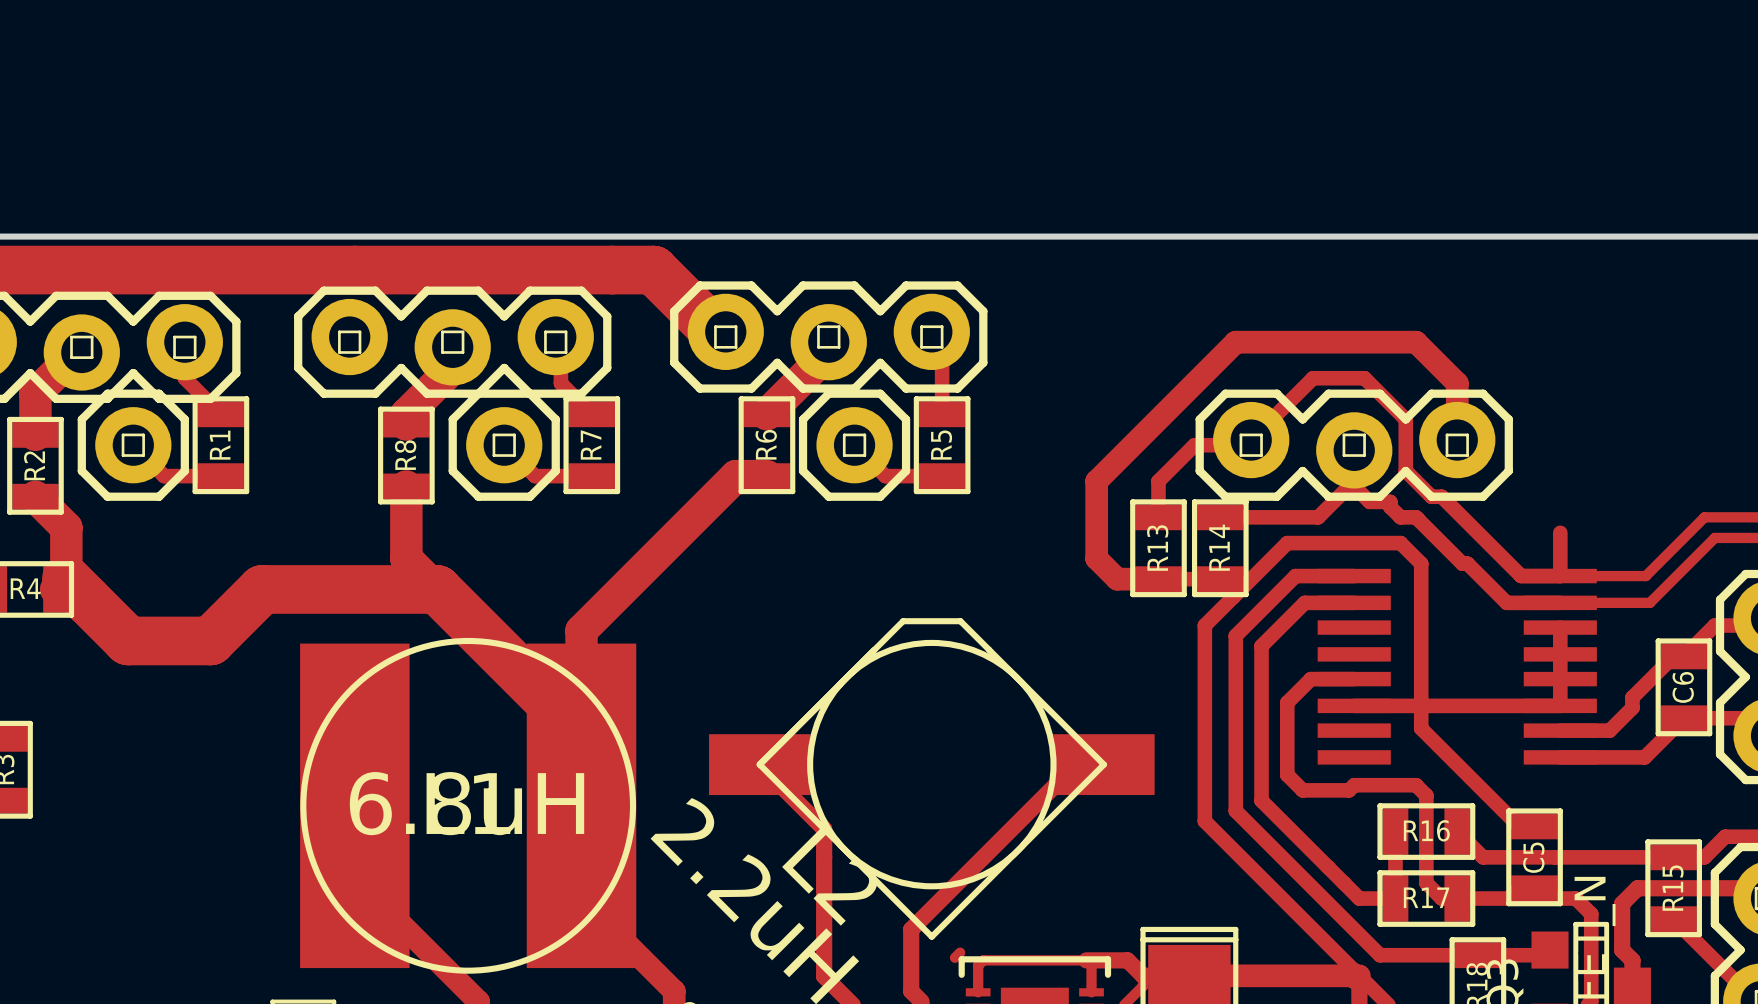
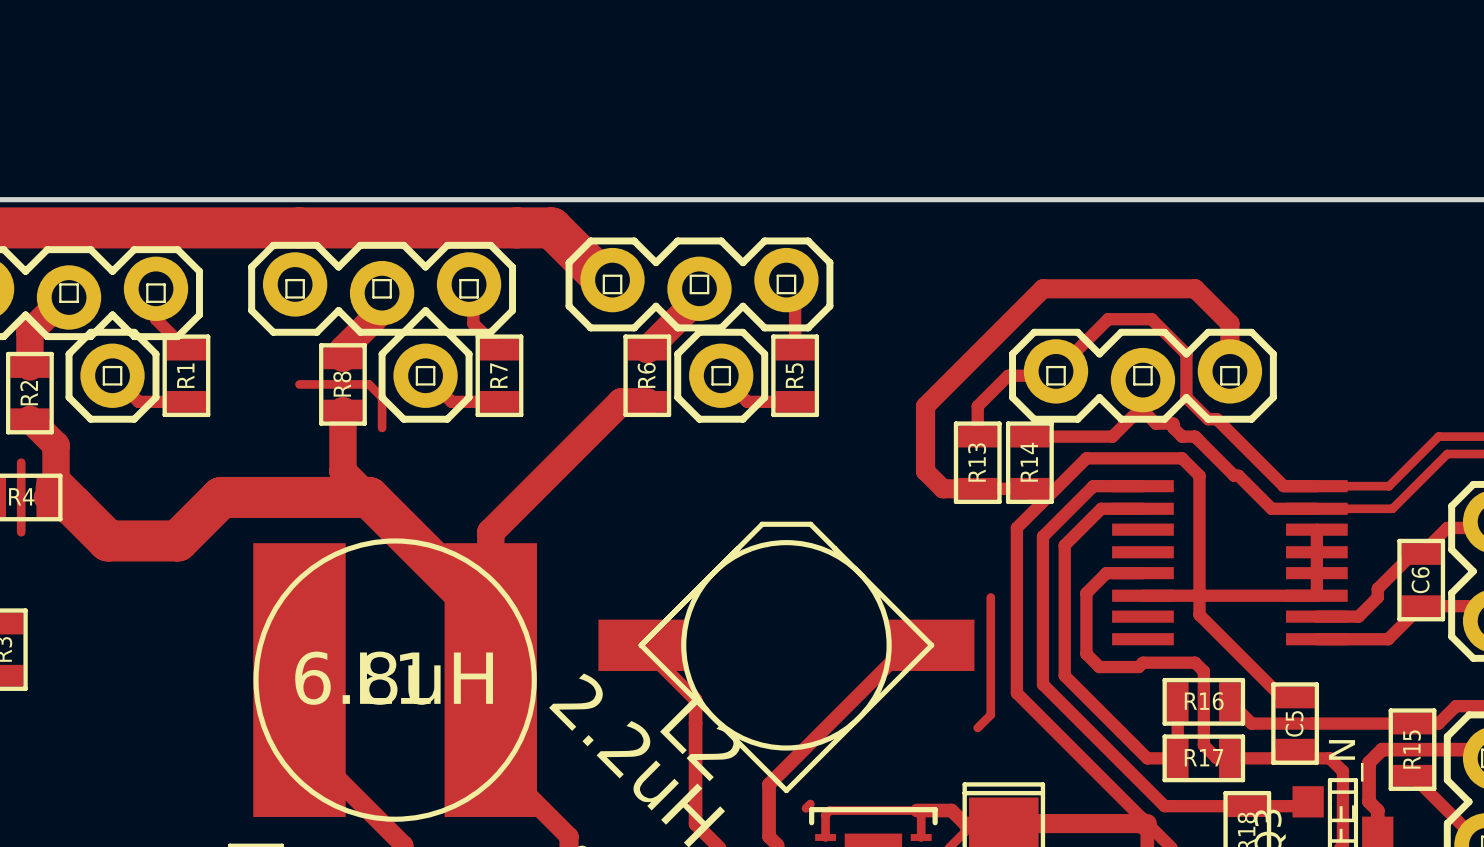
track: none -> (299, 384) (369, 384) (382, 397) (382, 427)
track: (1560, 532) (1560, 576) -> none
track: none -> (21, 462) (21, 532)
track: none -> (990, 597) (990, 714) (977, 727)

